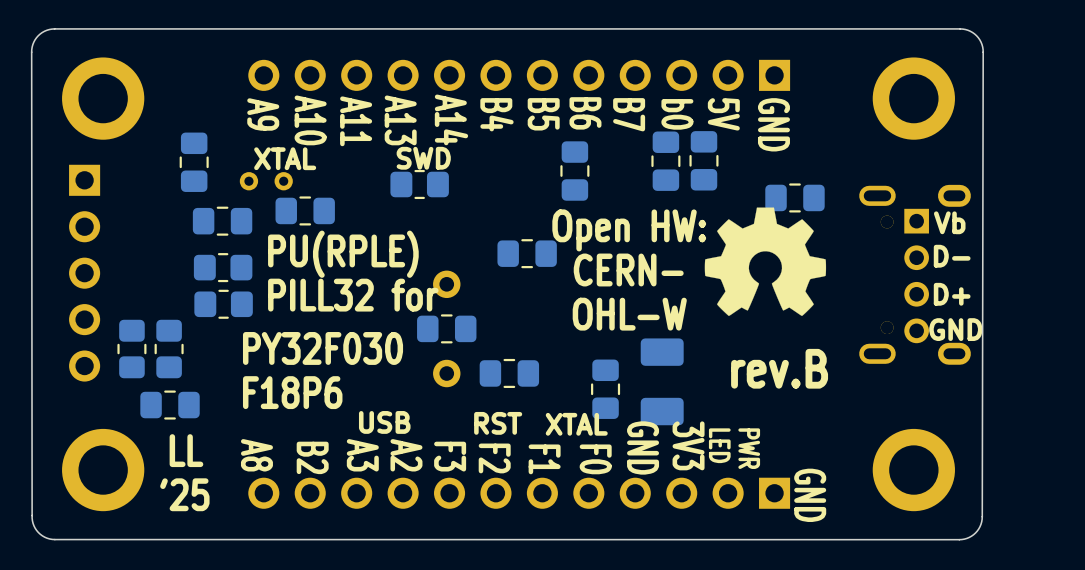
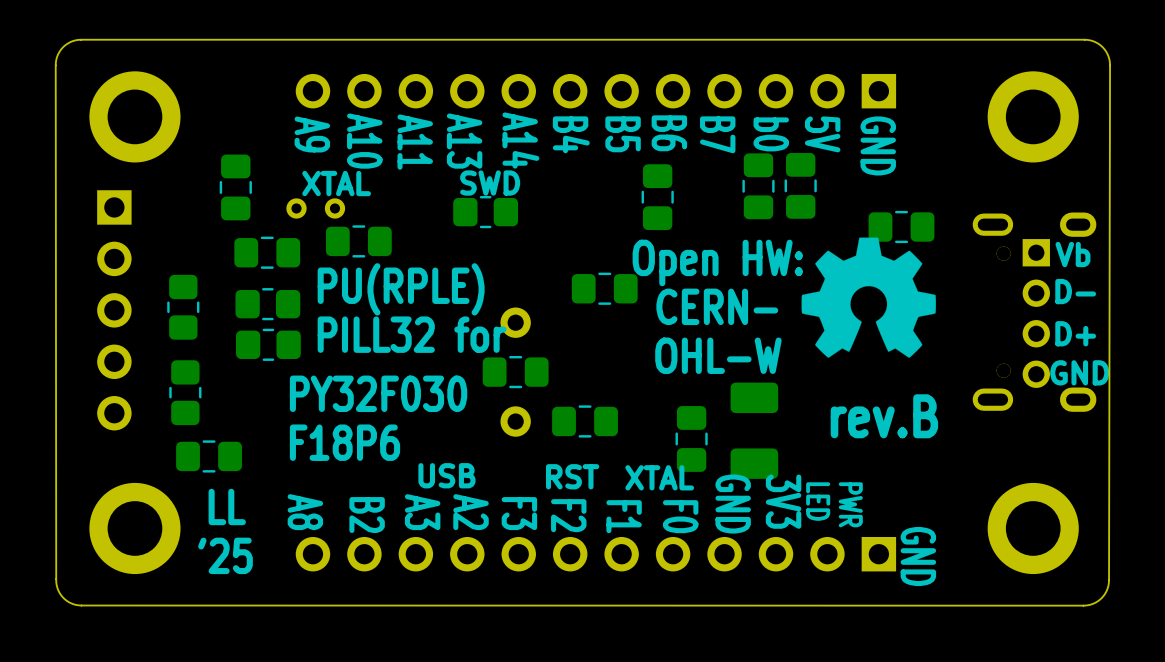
part: none -> (183, 307)
part: none -> (185, 392)
part: (131, 349) -> none
part: (169, 349) -> none

